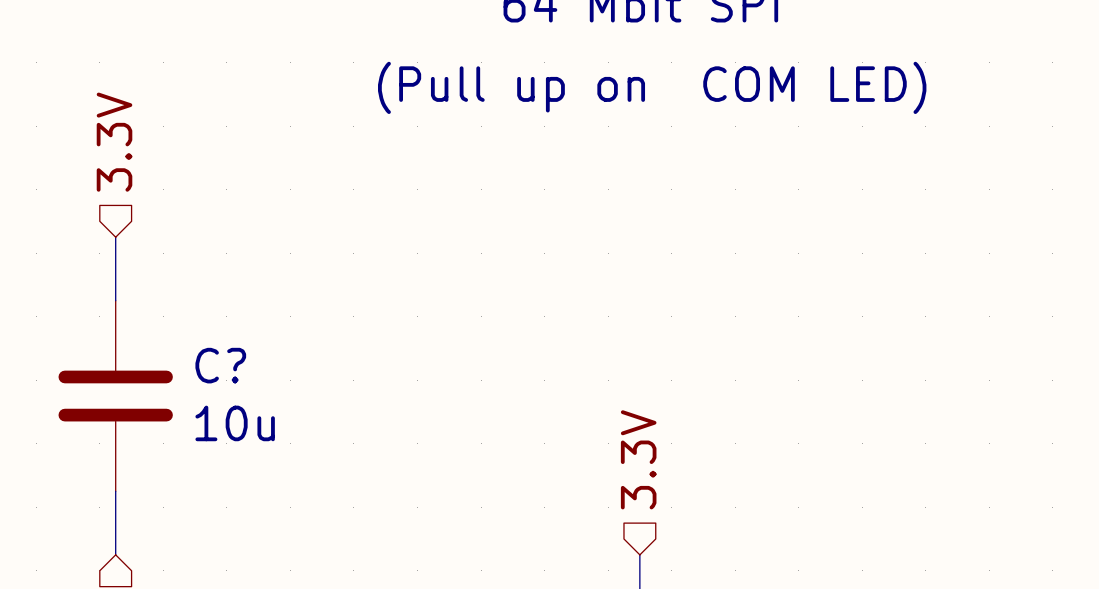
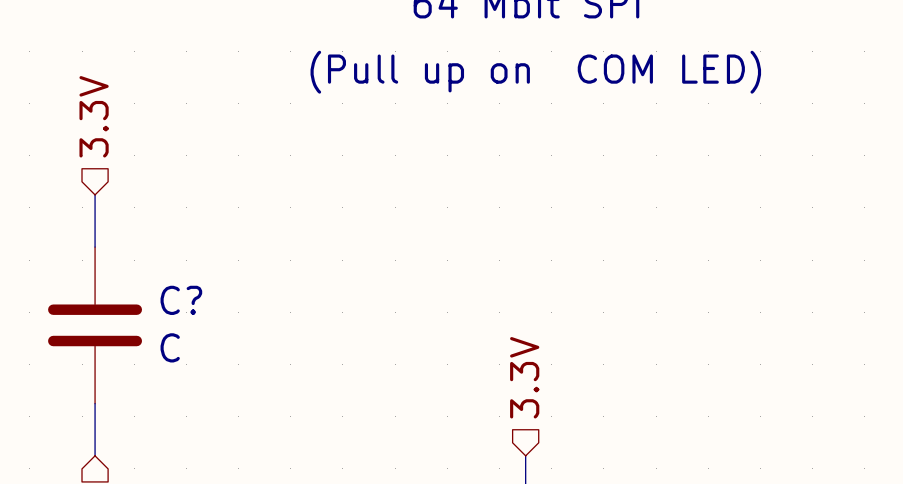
C? value: 10u (235, 423) -> C (170, 347)

